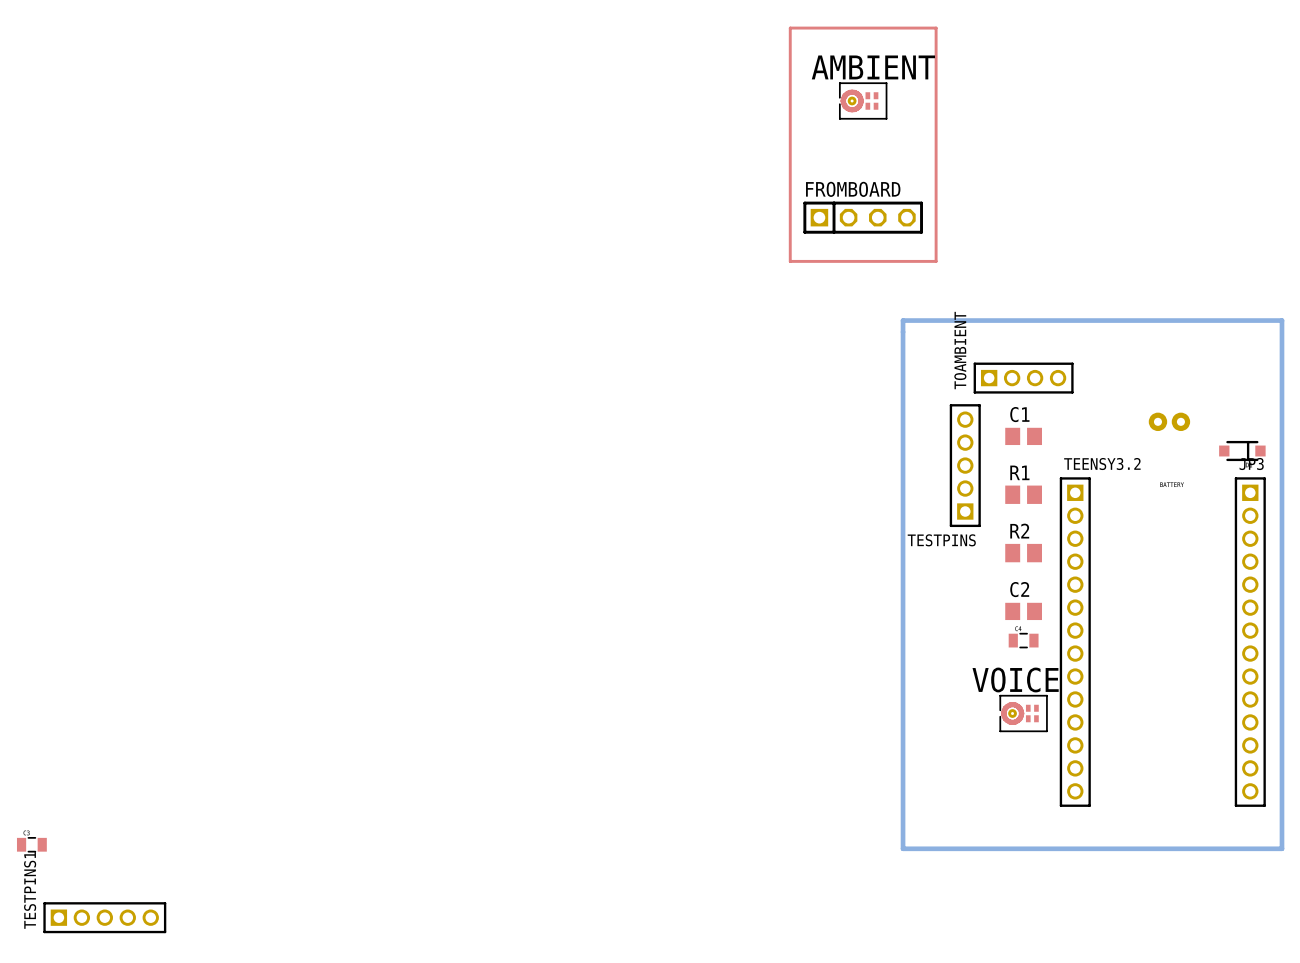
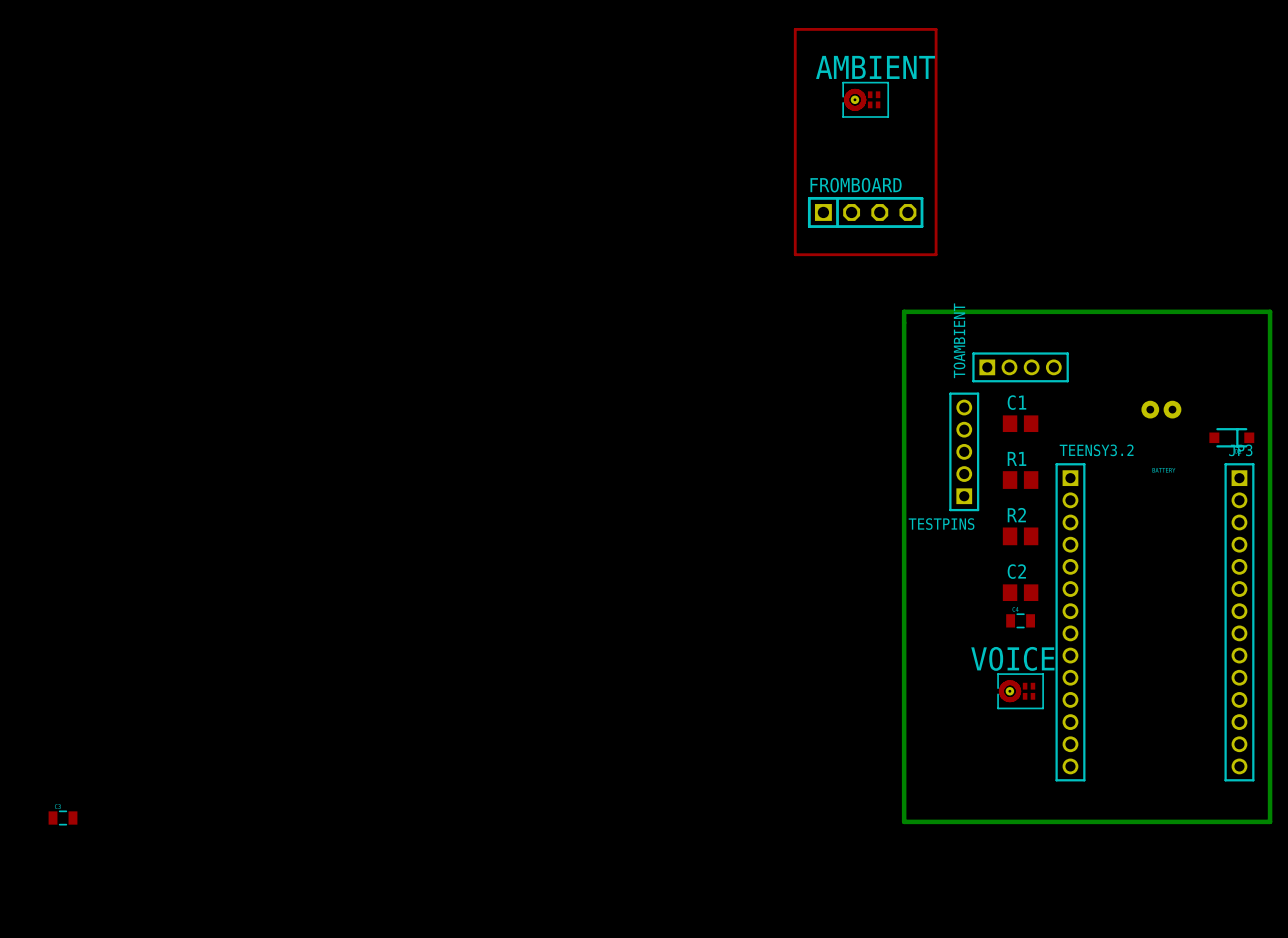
TESTPINS1: (104, 917) -> none

